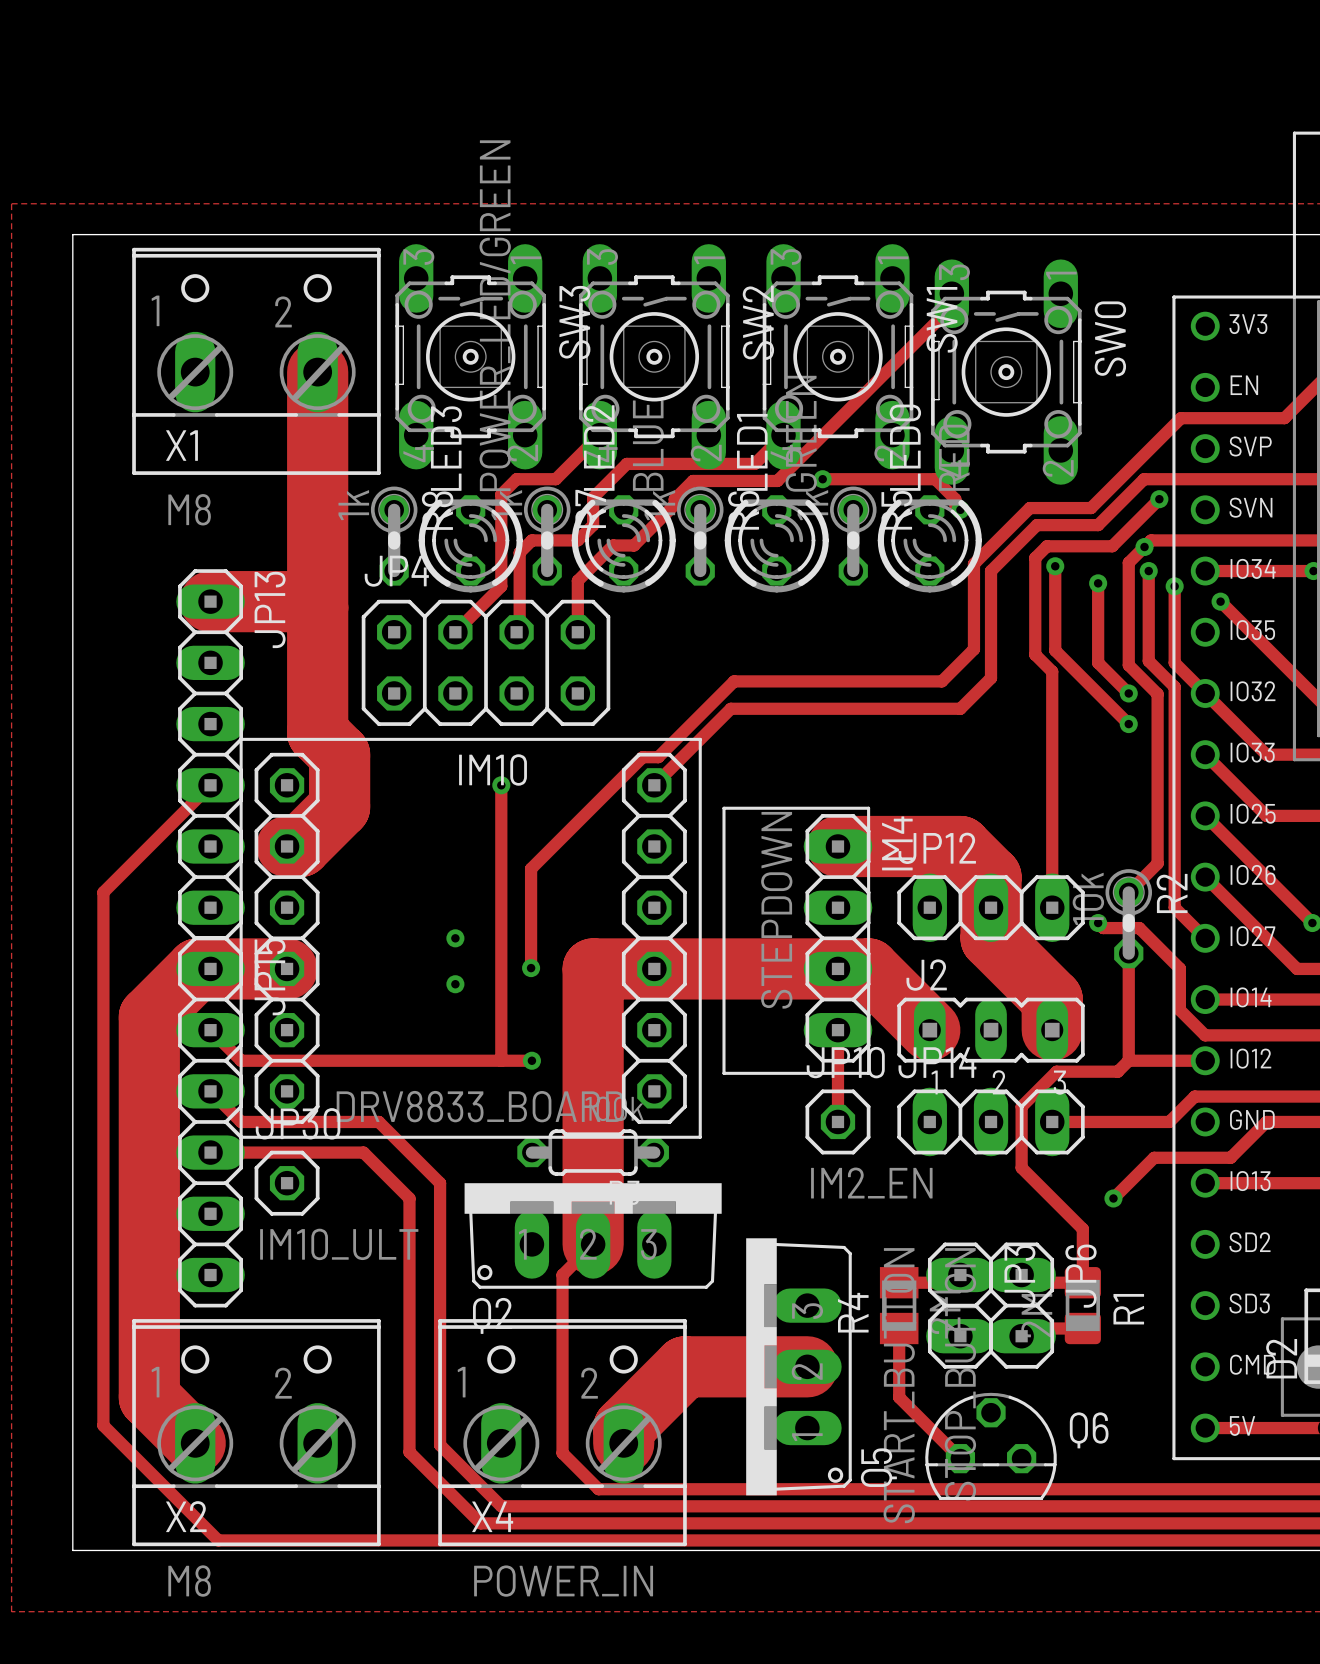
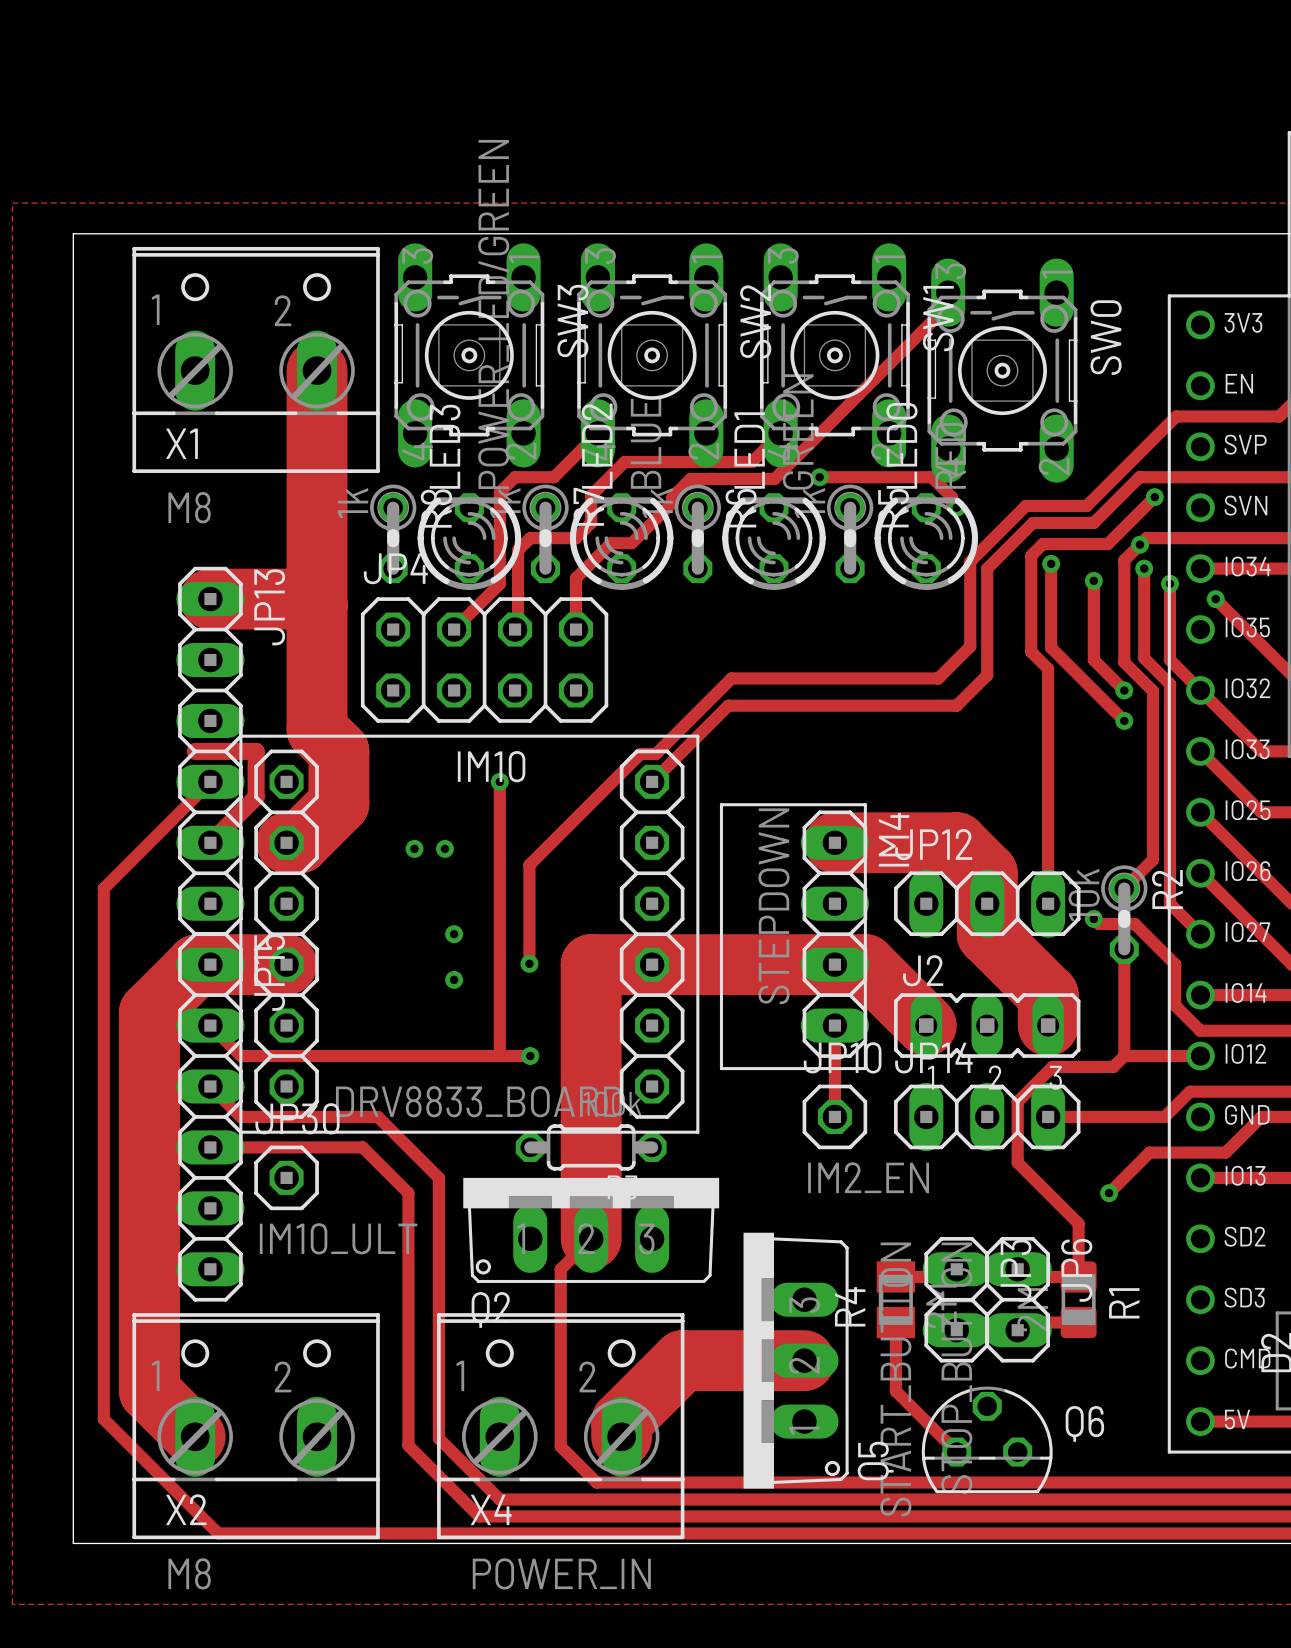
track: none -> (195, 751) (256, 751) (256, 797) (210, 842)
via: none -> (414, 848)
via: none -> (444, 848)

